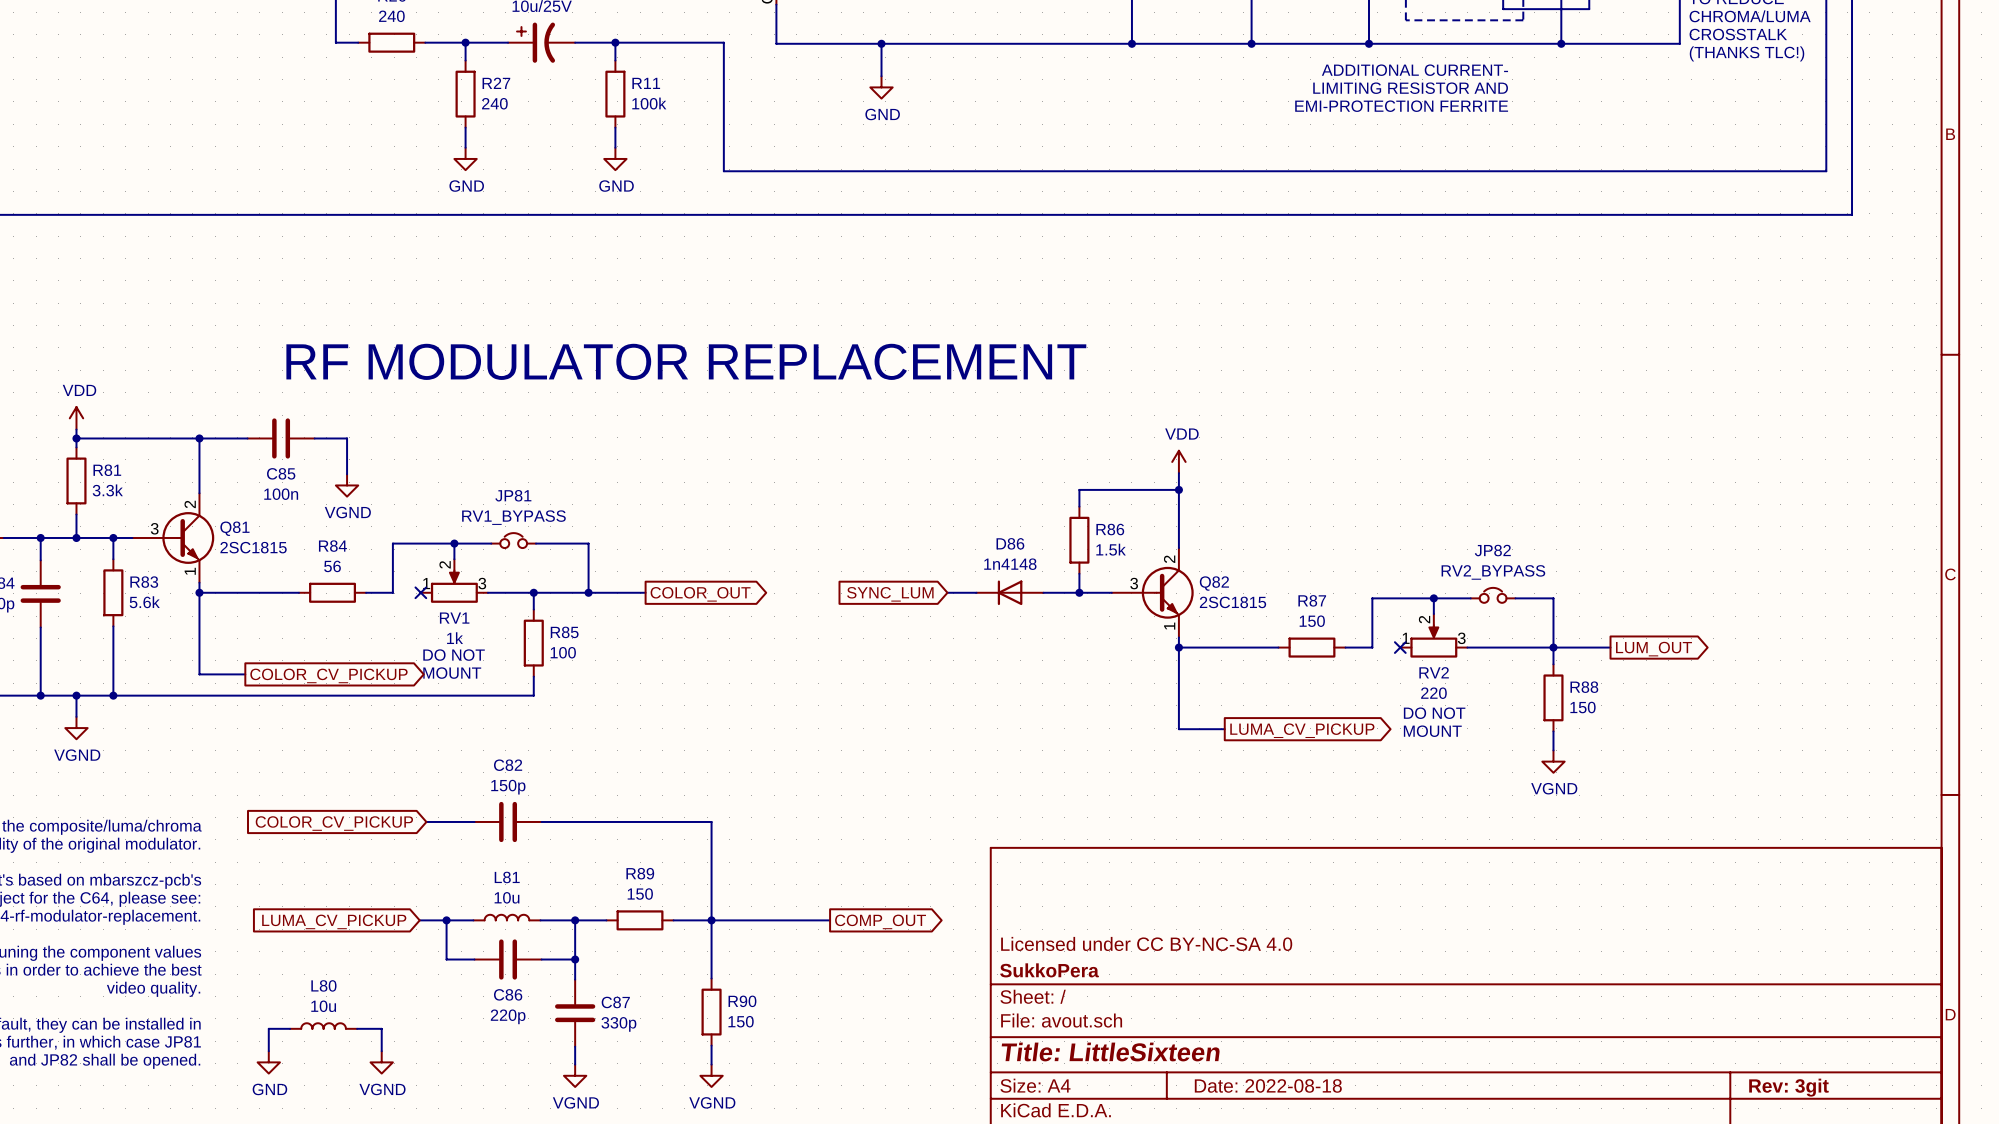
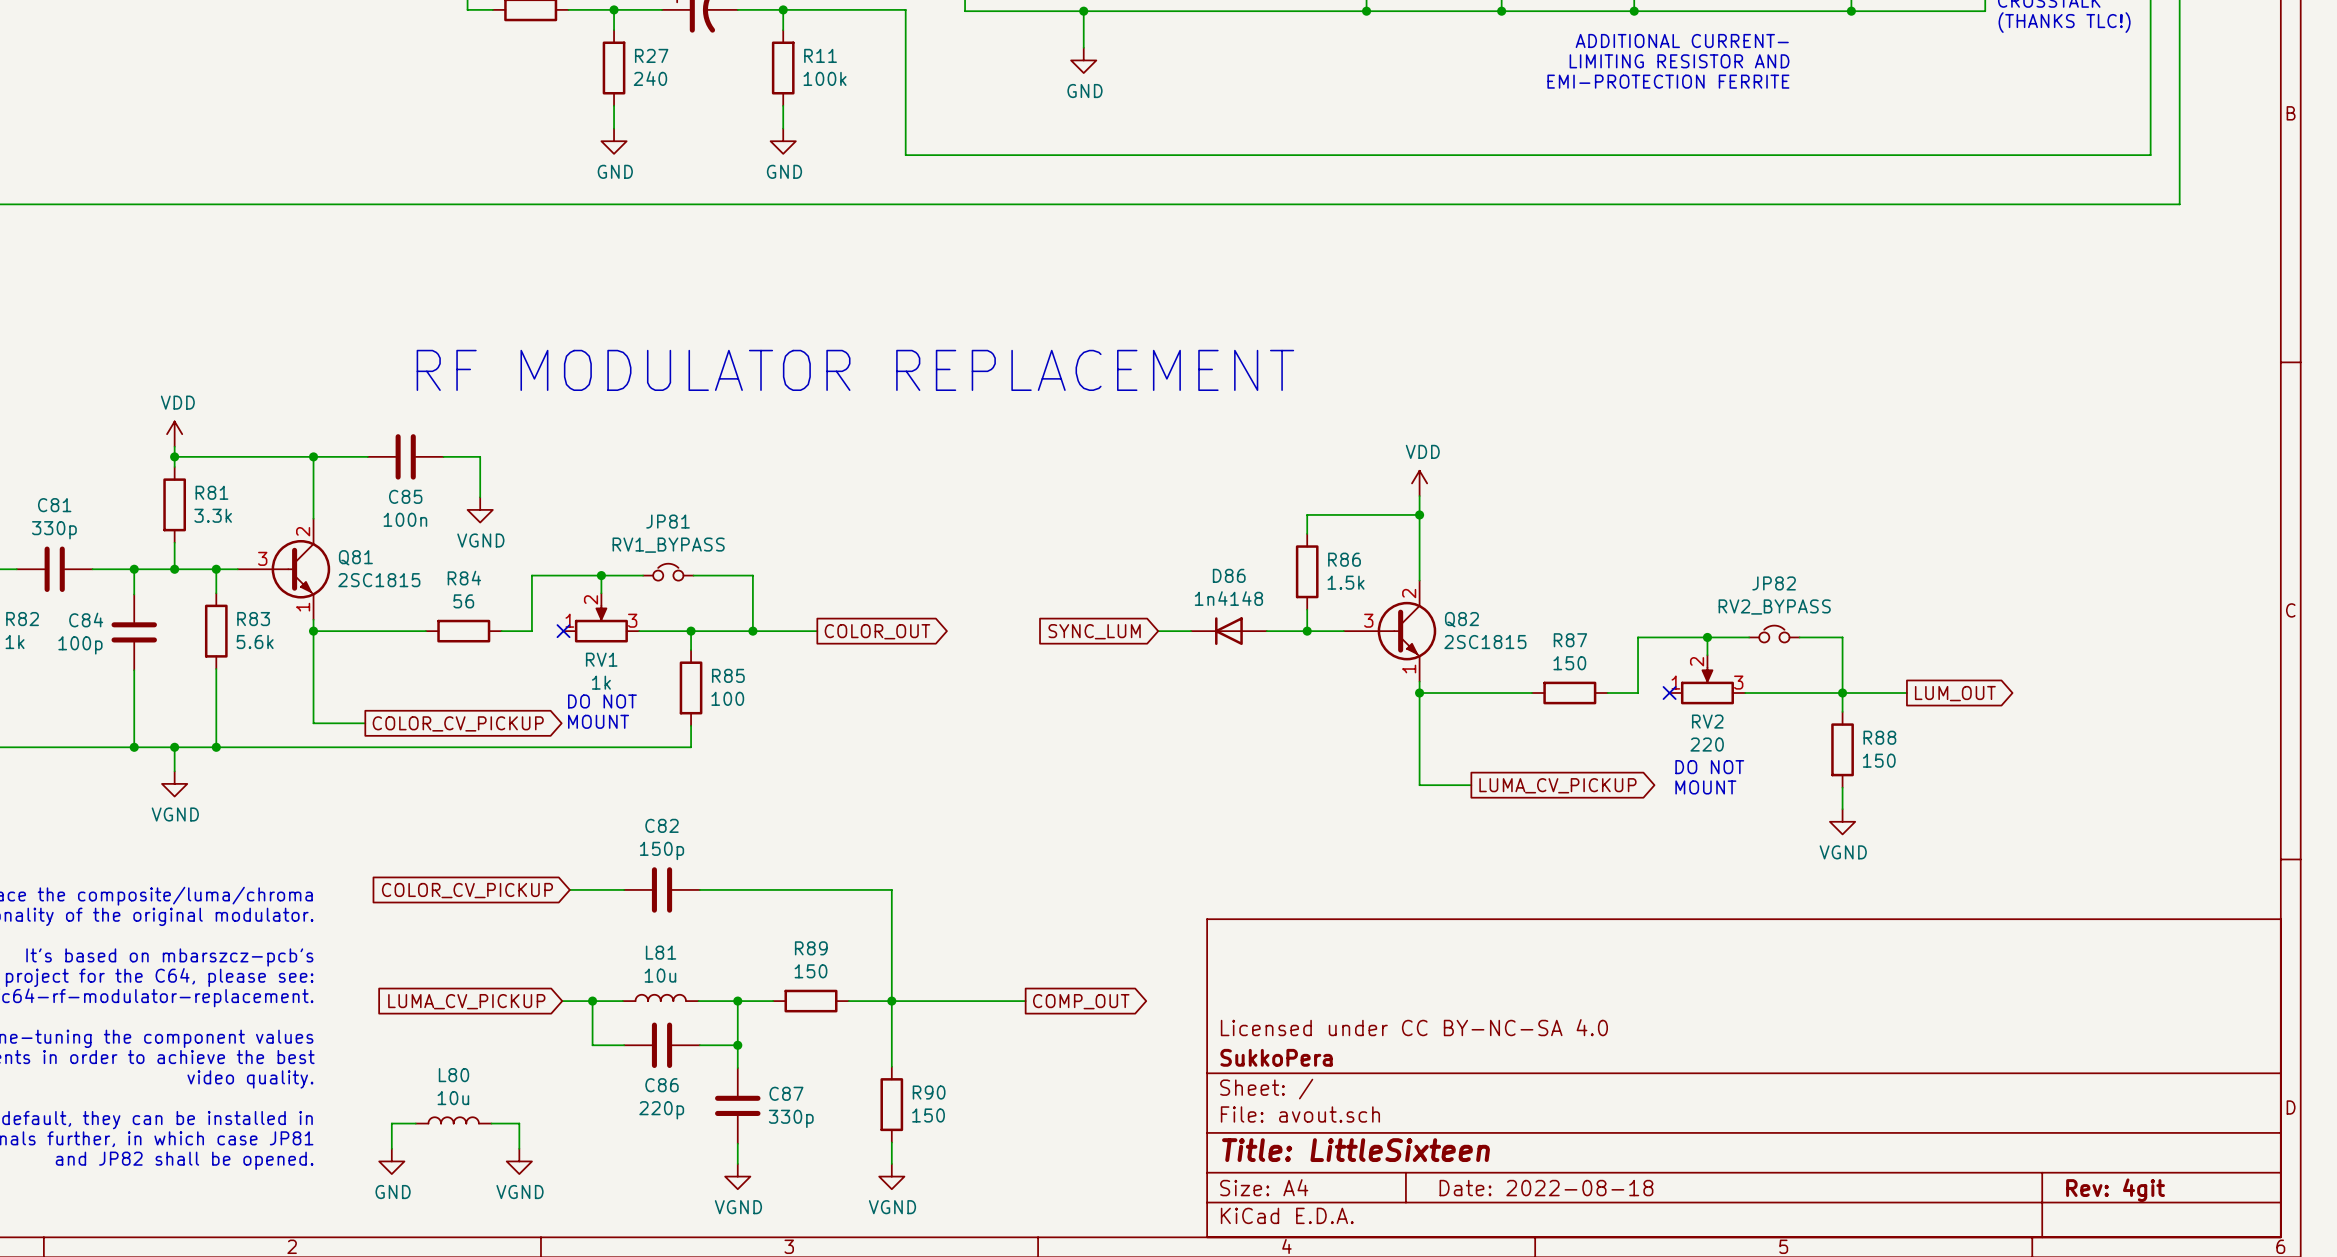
title block: Rev: 3git (1788, 1087) -> Rev: 4git (2115, 1190)

